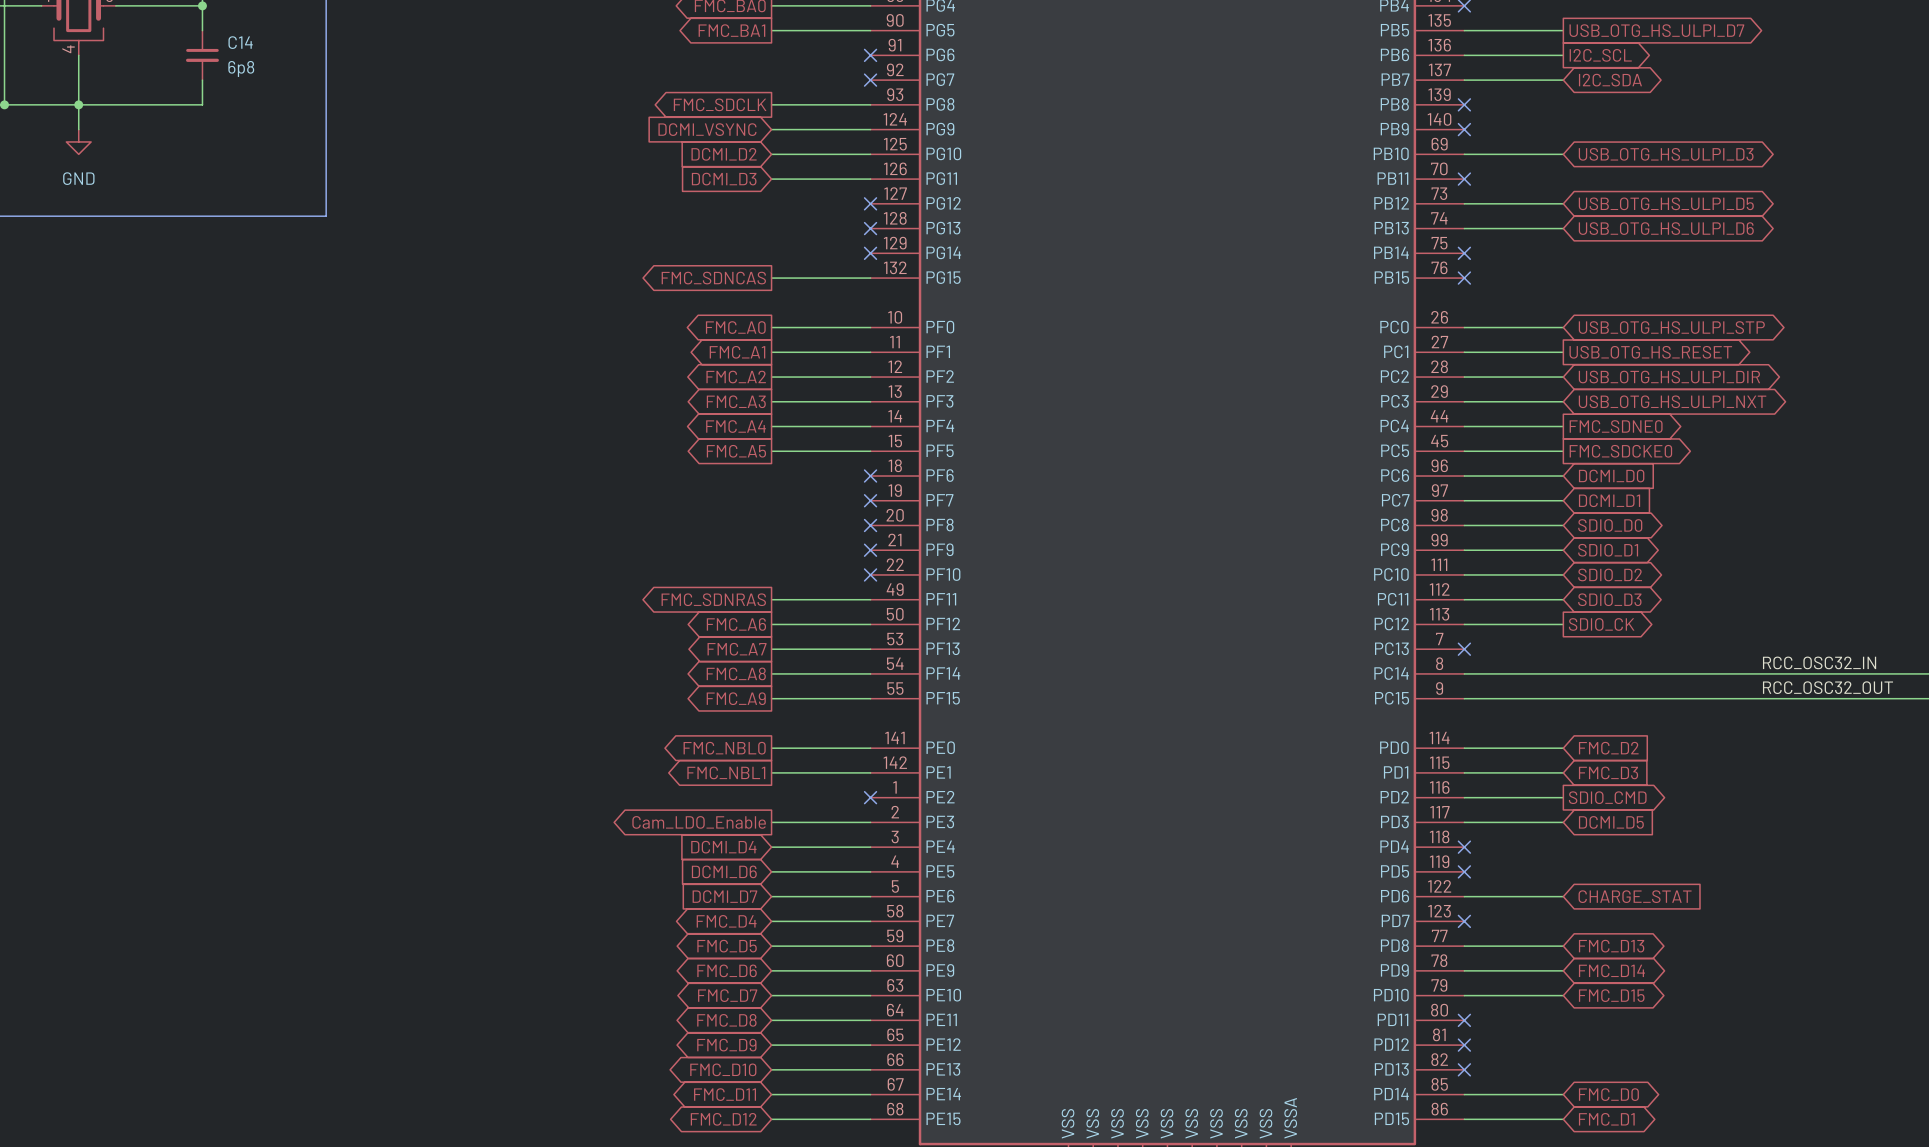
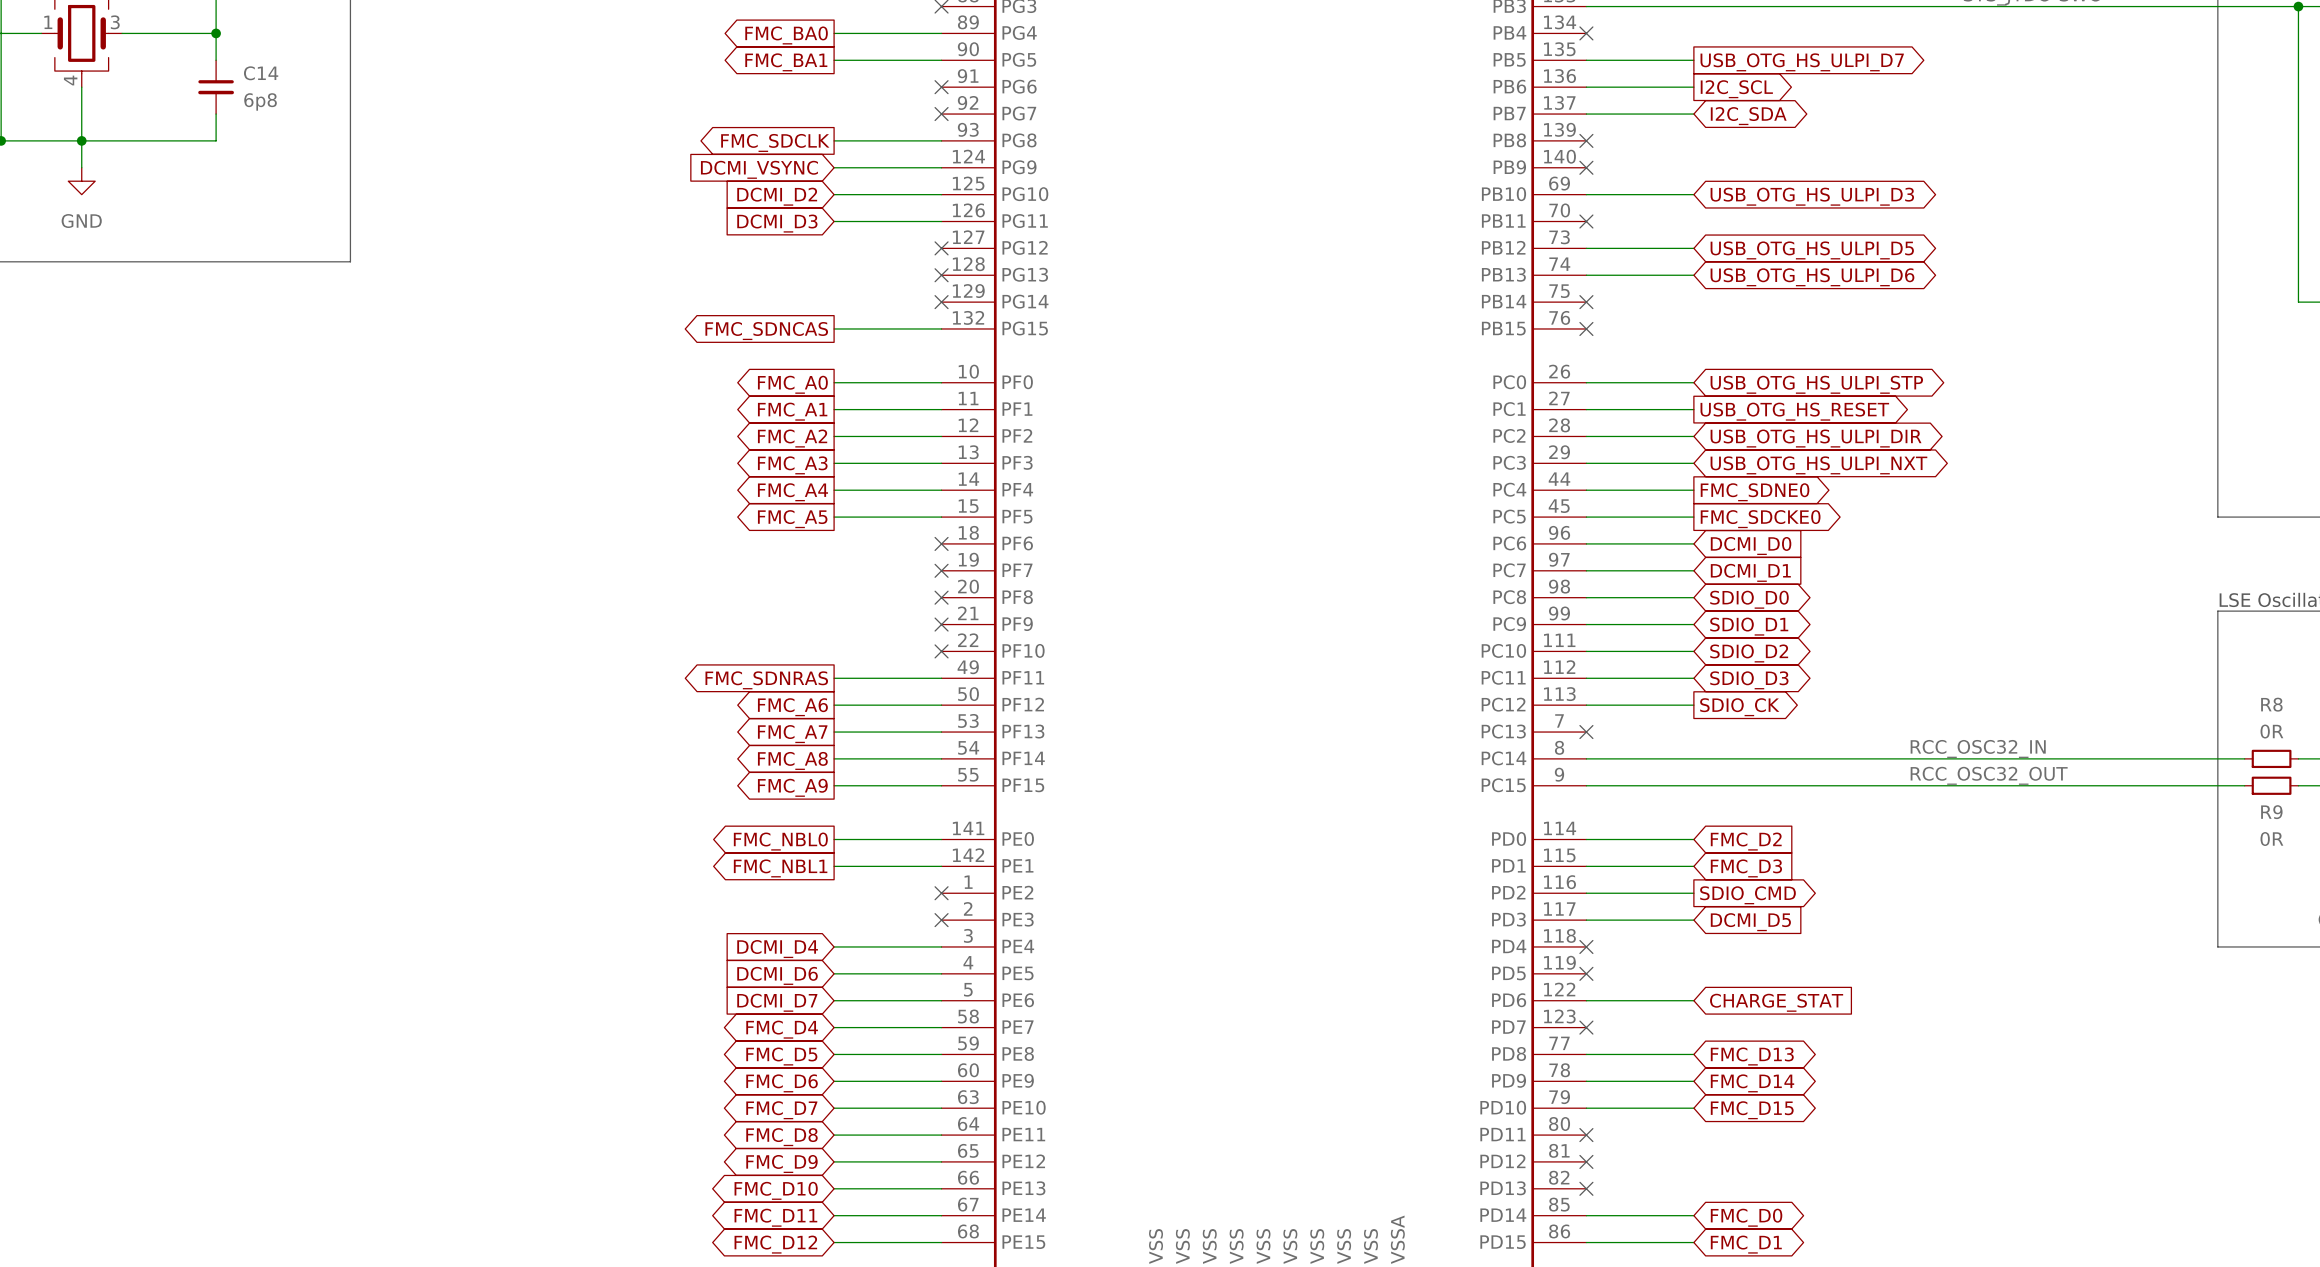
global label: Cam_LDO_Enable (699, 822) -> none
wire: (771, 822) (870, 822) -> none
no-connect mark: none -> (941, 920)

